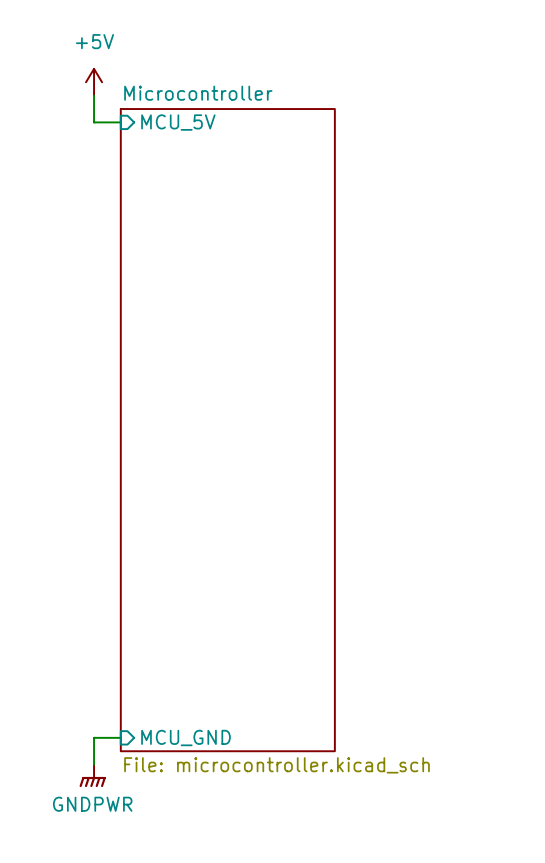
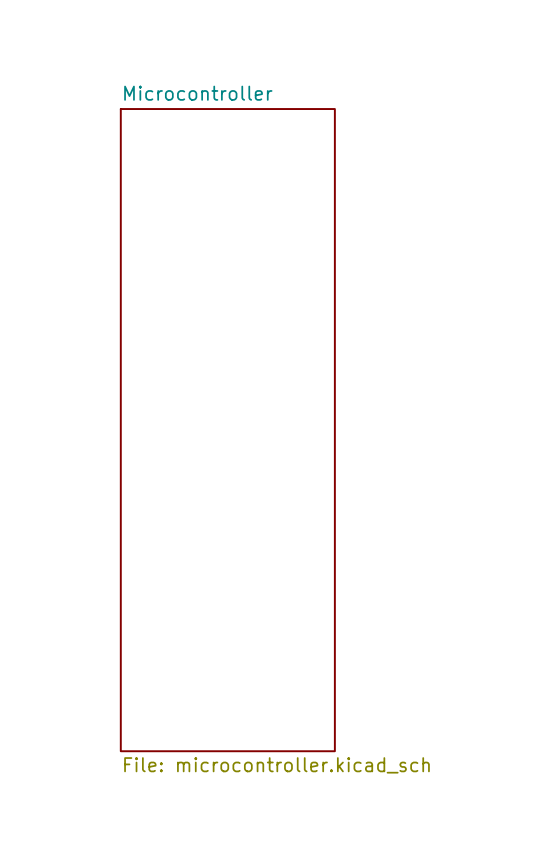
power symbol: +5V (94, 82) -> none
wire: (94, 95) (94, 122) (120, 122) -> none
sheet pin: MCU_5V (178, 122) -> none
wire: (120, 737) (94, 737) (94, 764) -> none
sheet pin: MCU_GND (186, 737) -> none
power symbol: GNDPWR (92, 775) -> none

